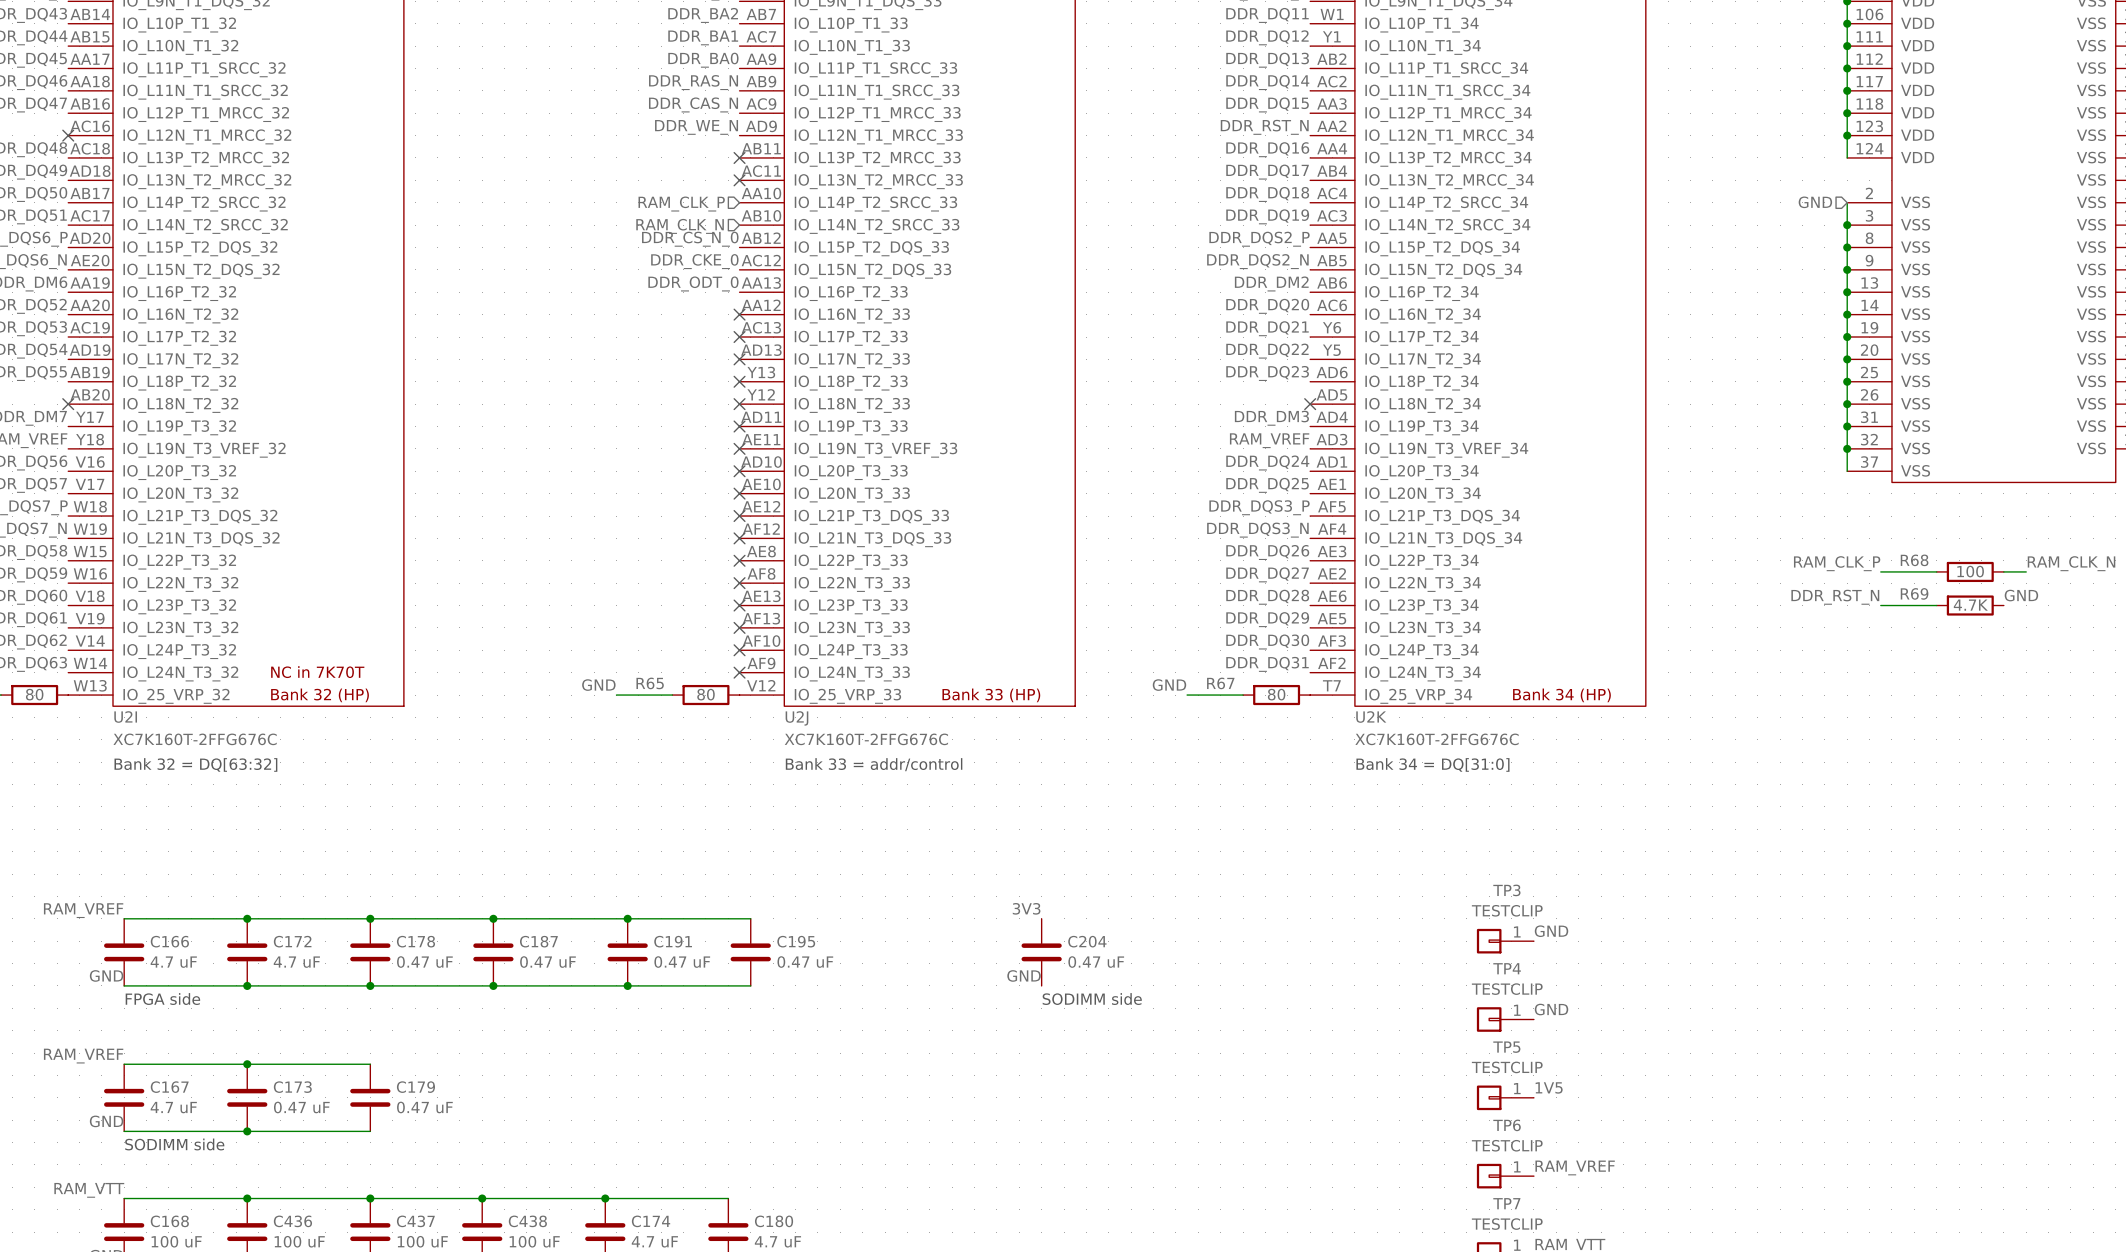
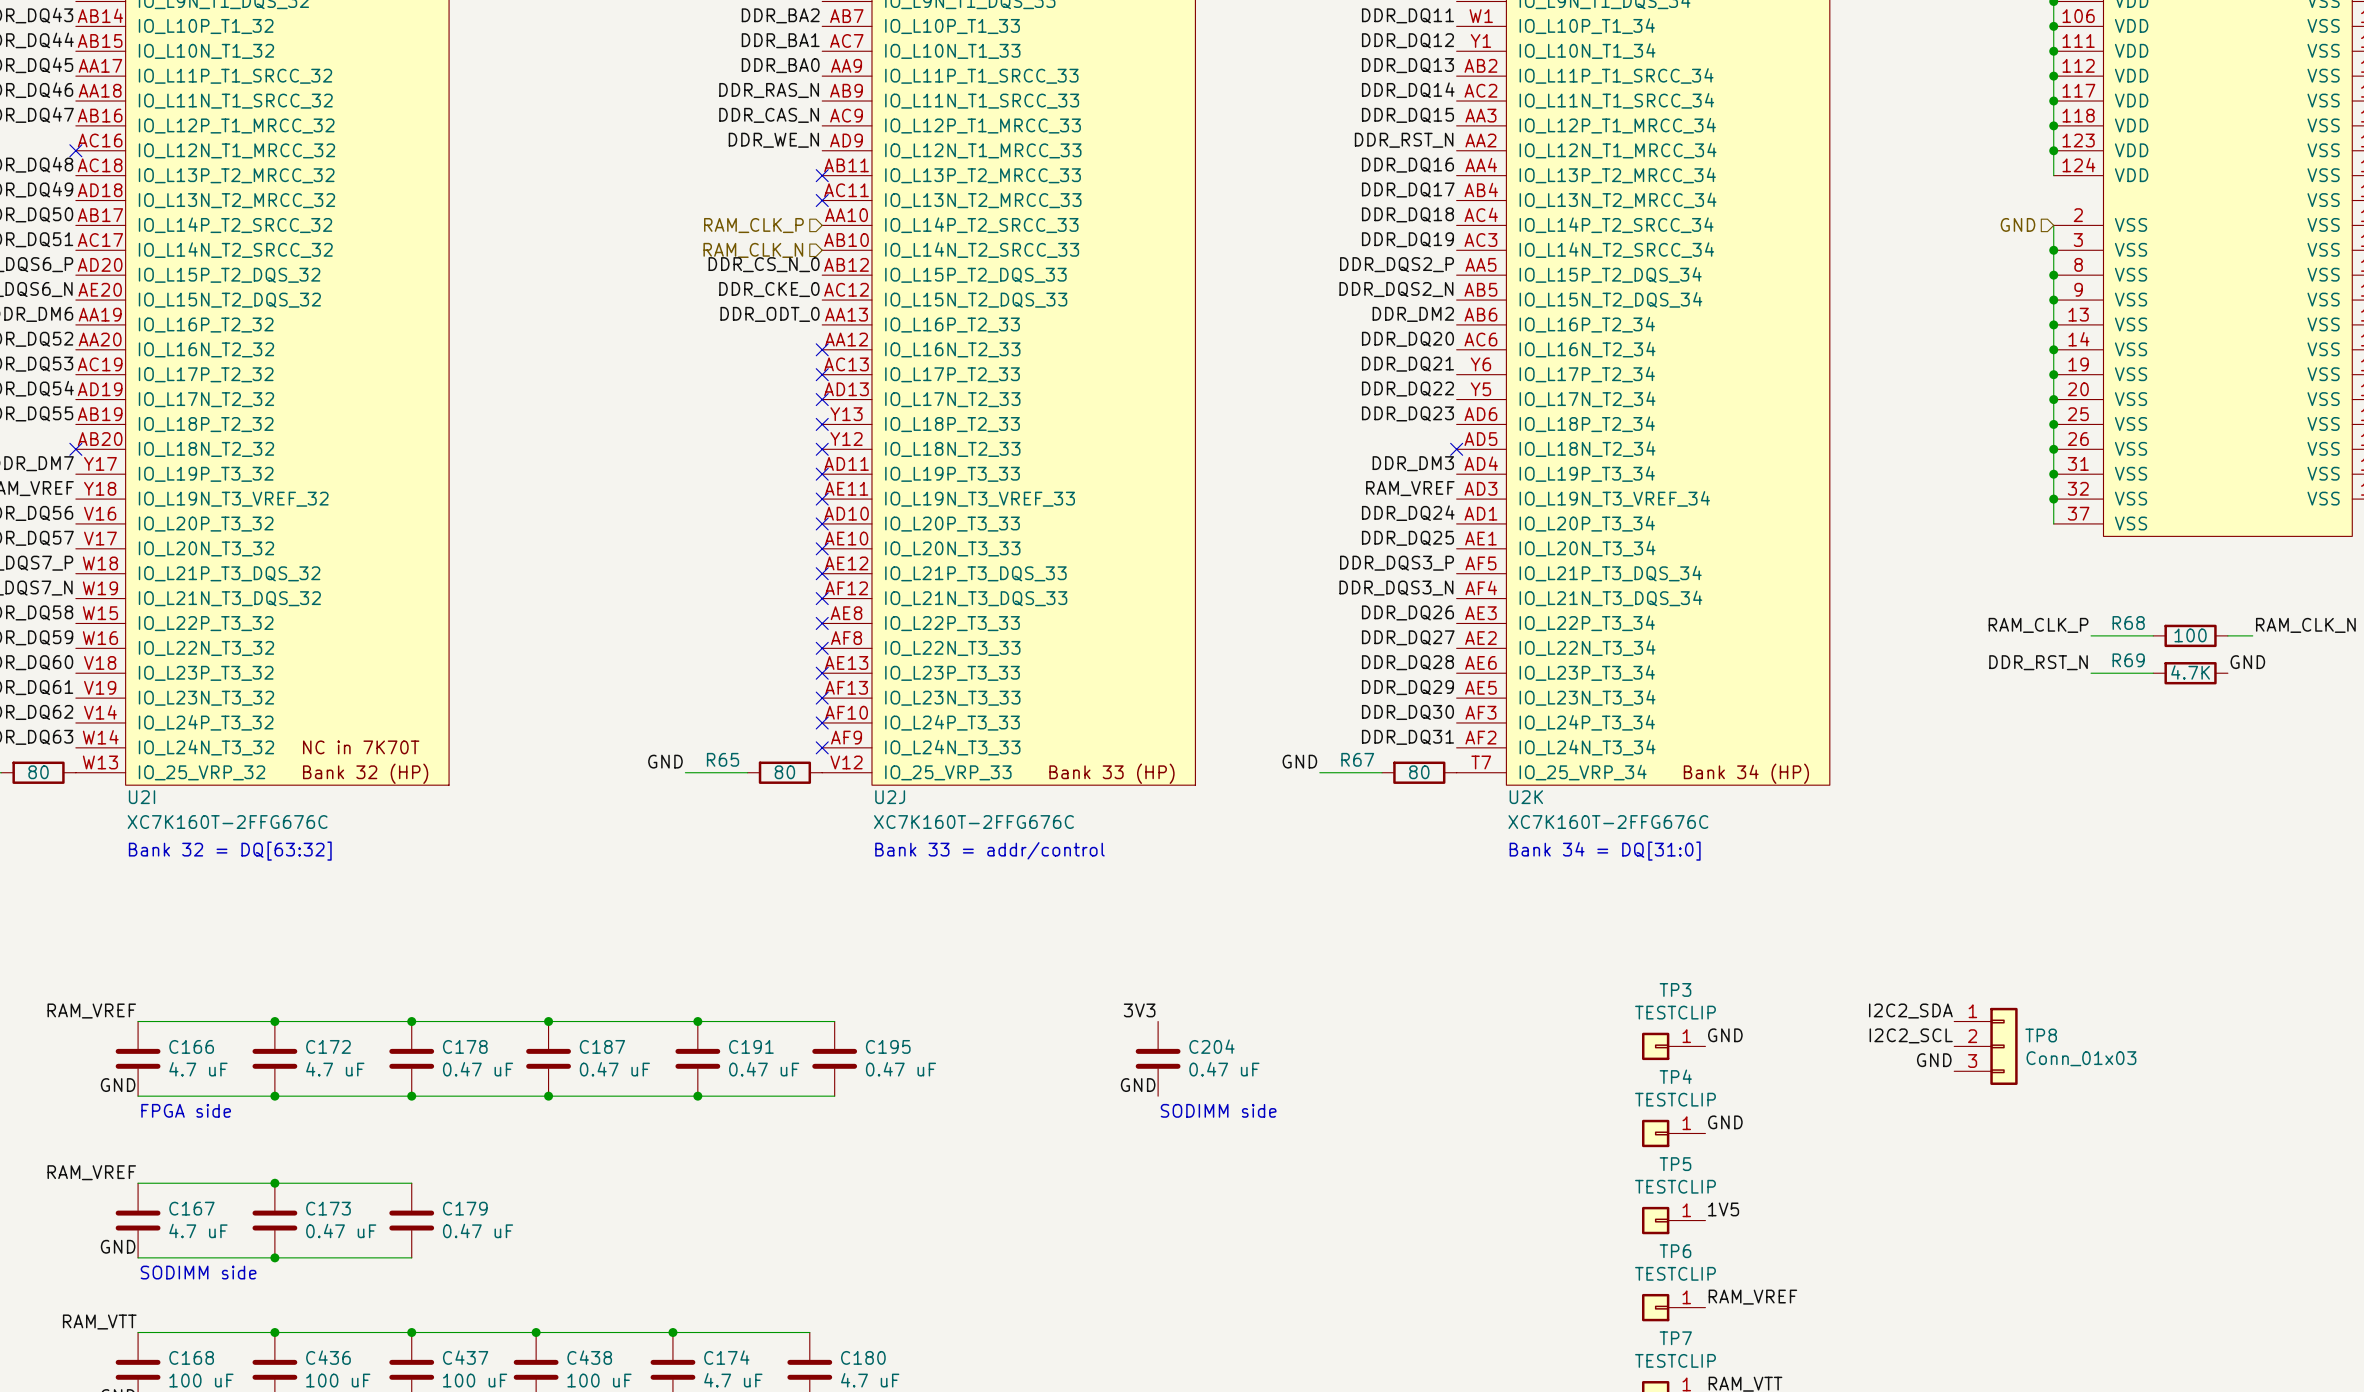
label: none -> I2C2_SDA (1910, 1011)
label: none -> I2C2_SCL (1911, 1035)
TP8: none -> Conn_01x03 (1985, 1046)
label: none -> GND (1934, 1060)

